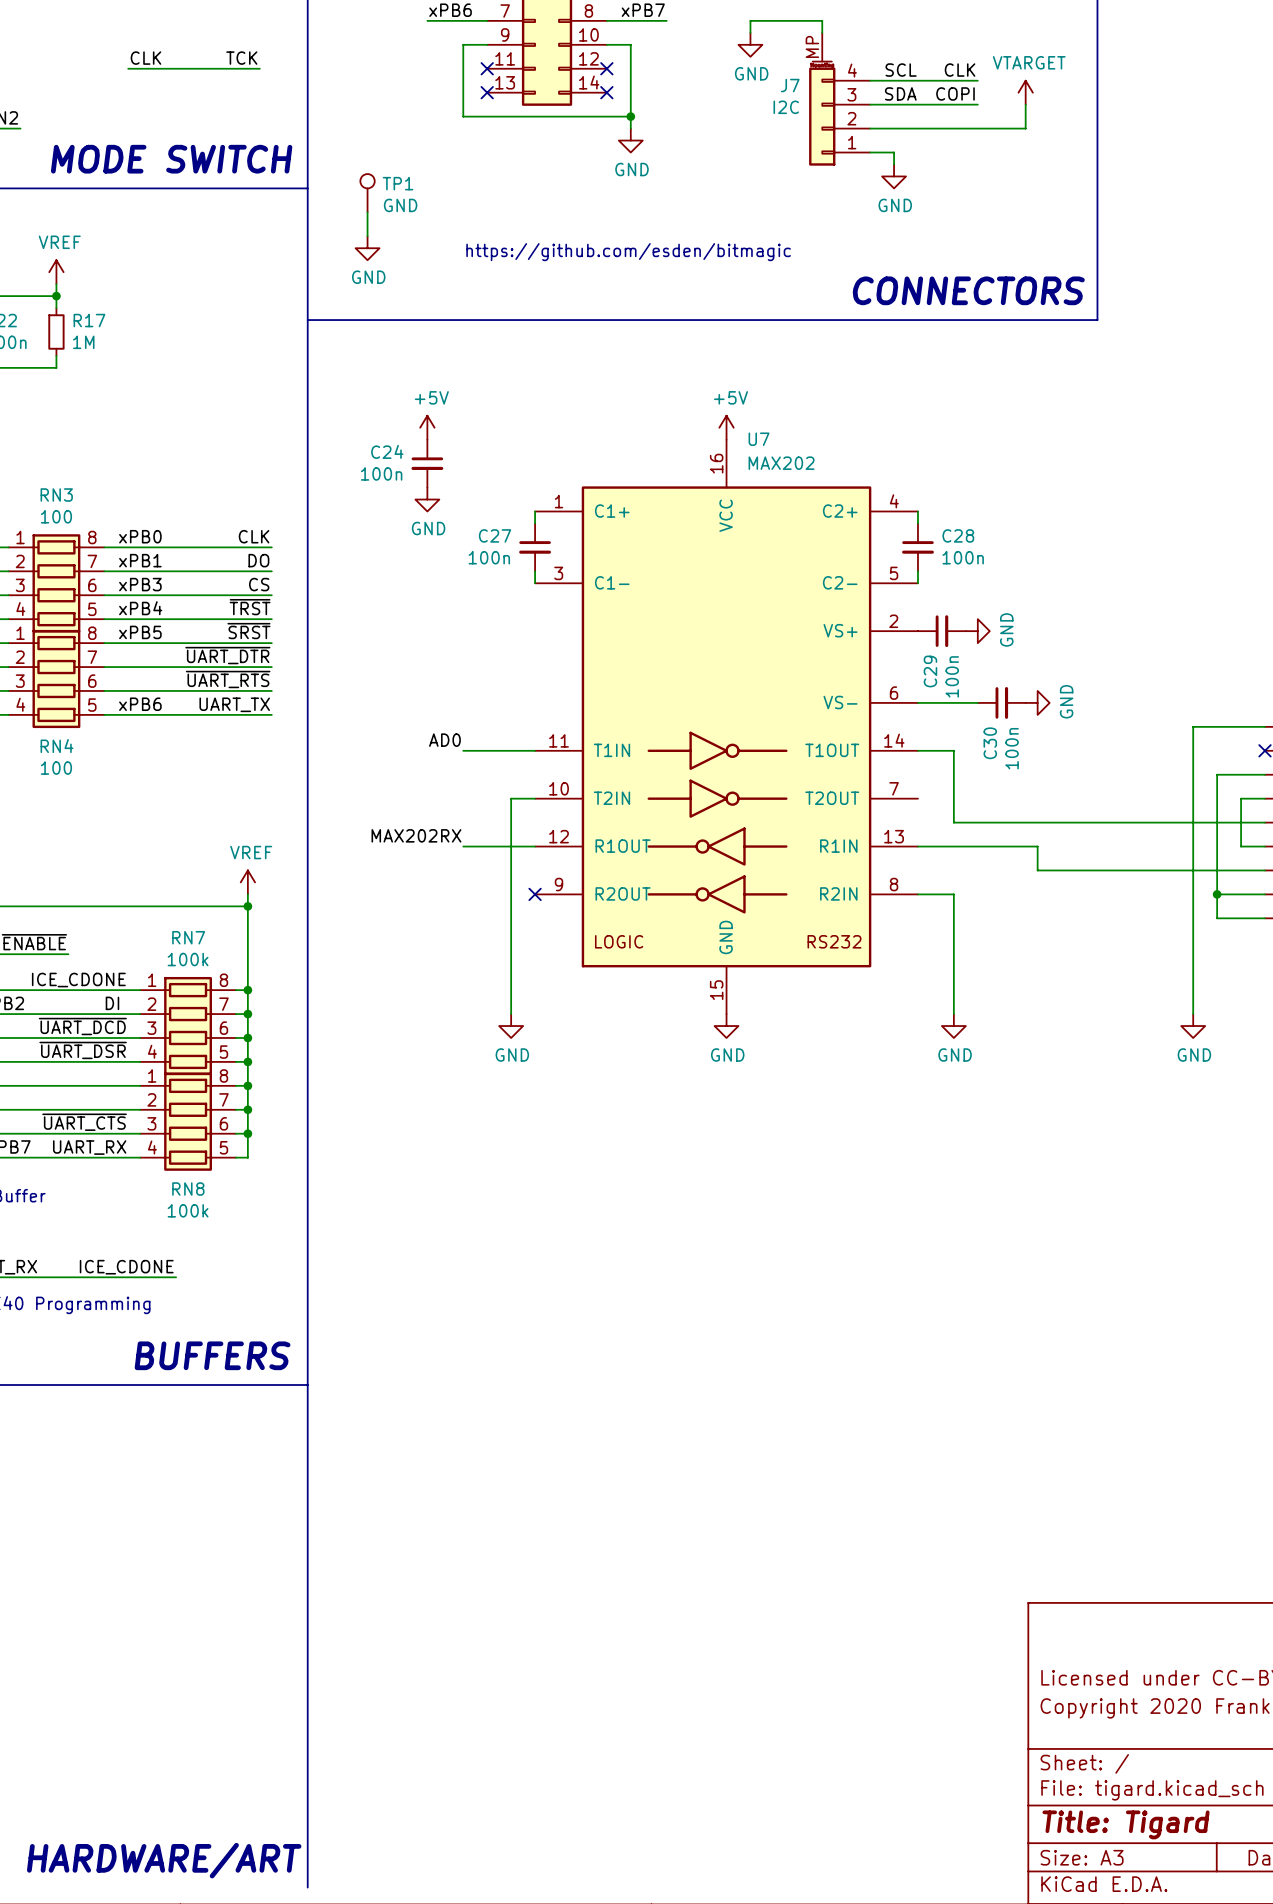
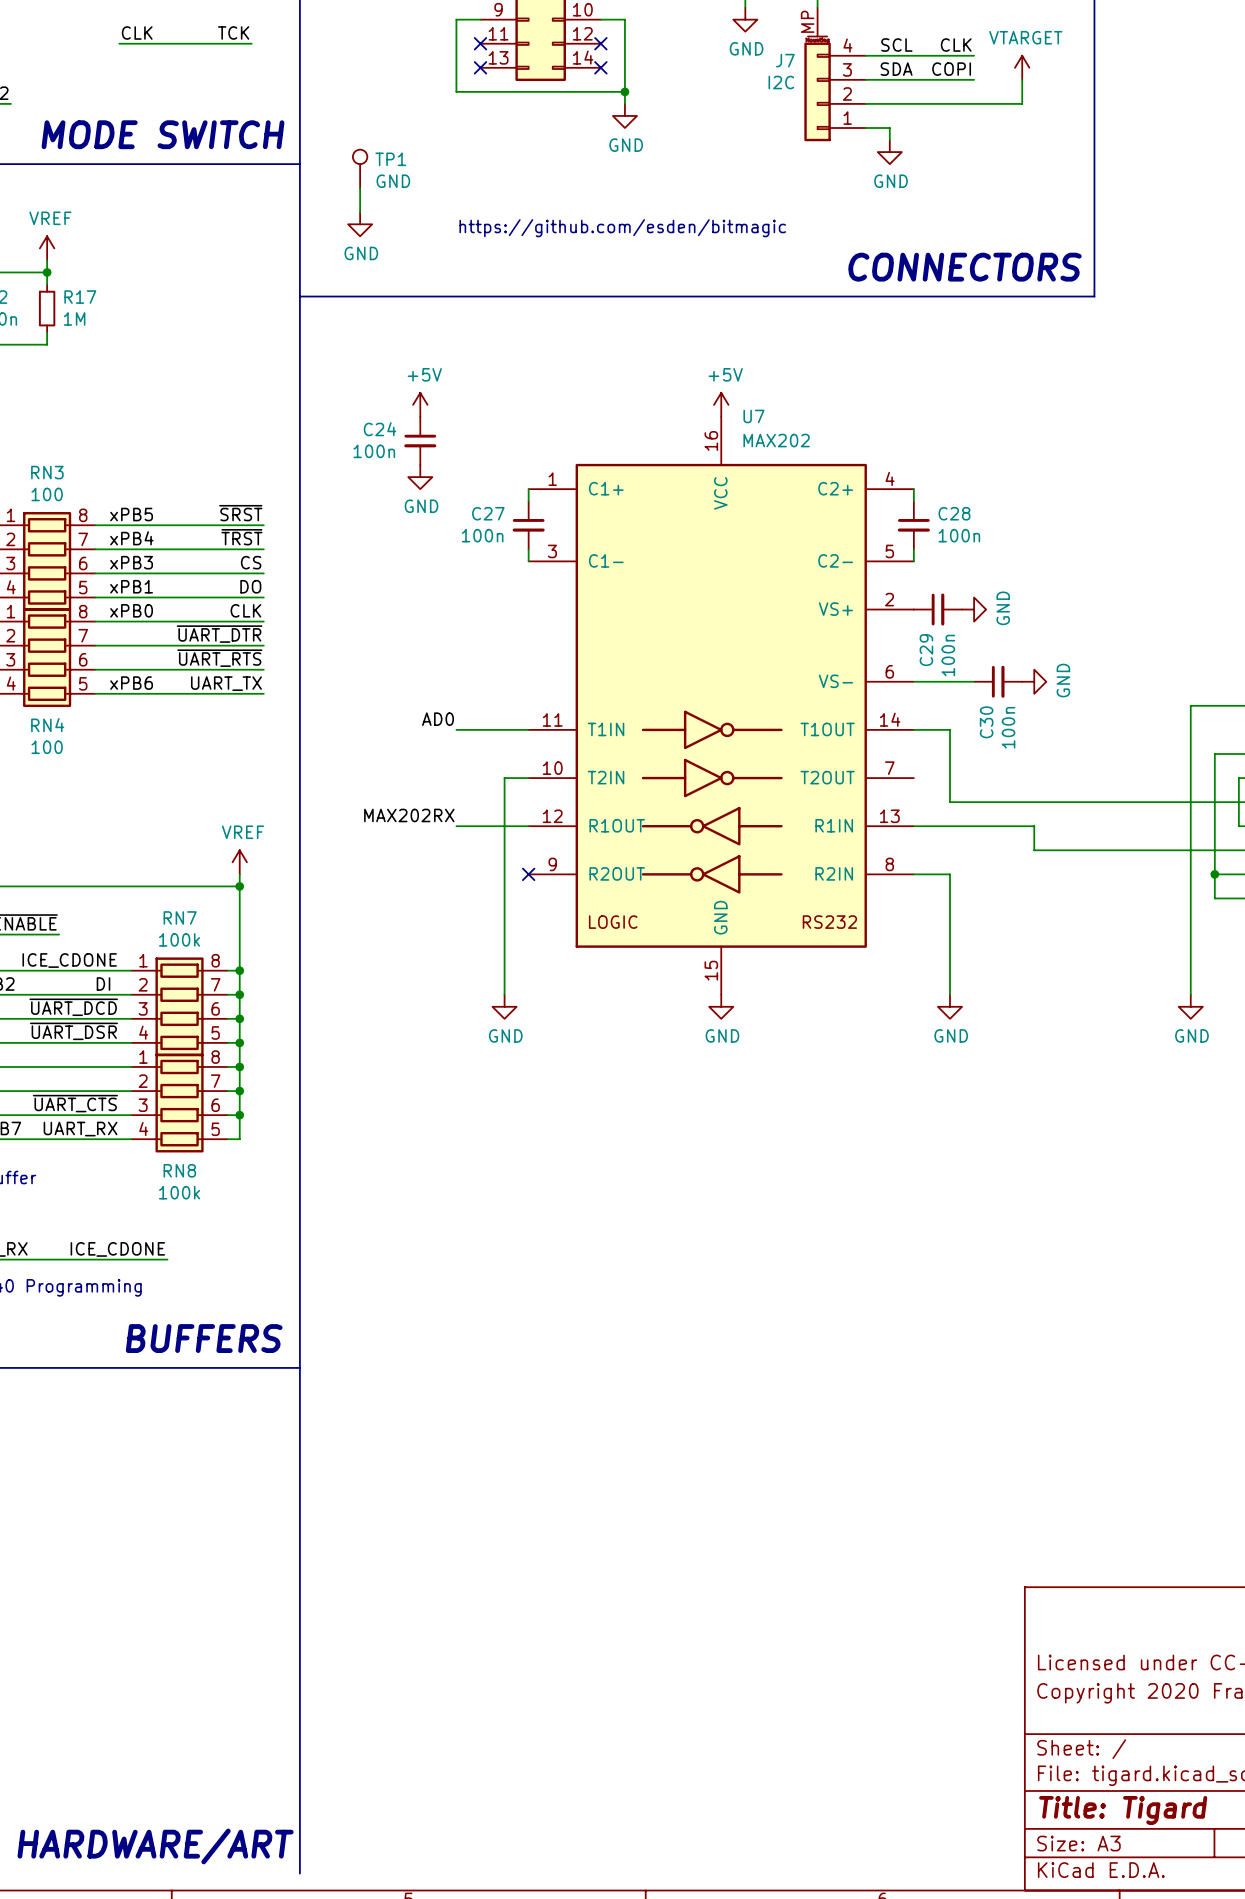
label: xPB0 (140, 536) -> xPB5 (131, 514)
label: CLK (254, 536) -> ~{SRST} (240, 513)
label: xPB1 (140, 560) -> xPB4 (131, 538)
label: DO (258, 560) -> ~{TRST} (241, 537)
label: ~{TRST} (250, 607) -> DO (250, 586)
label: xPB4 (140, 608) -> xPB1 (131, 586)
label: ~{SRST} (248, 631) -> CLK (245, 610)
label: xPB5 (140, 632) -> xPB0 (131, 610)

